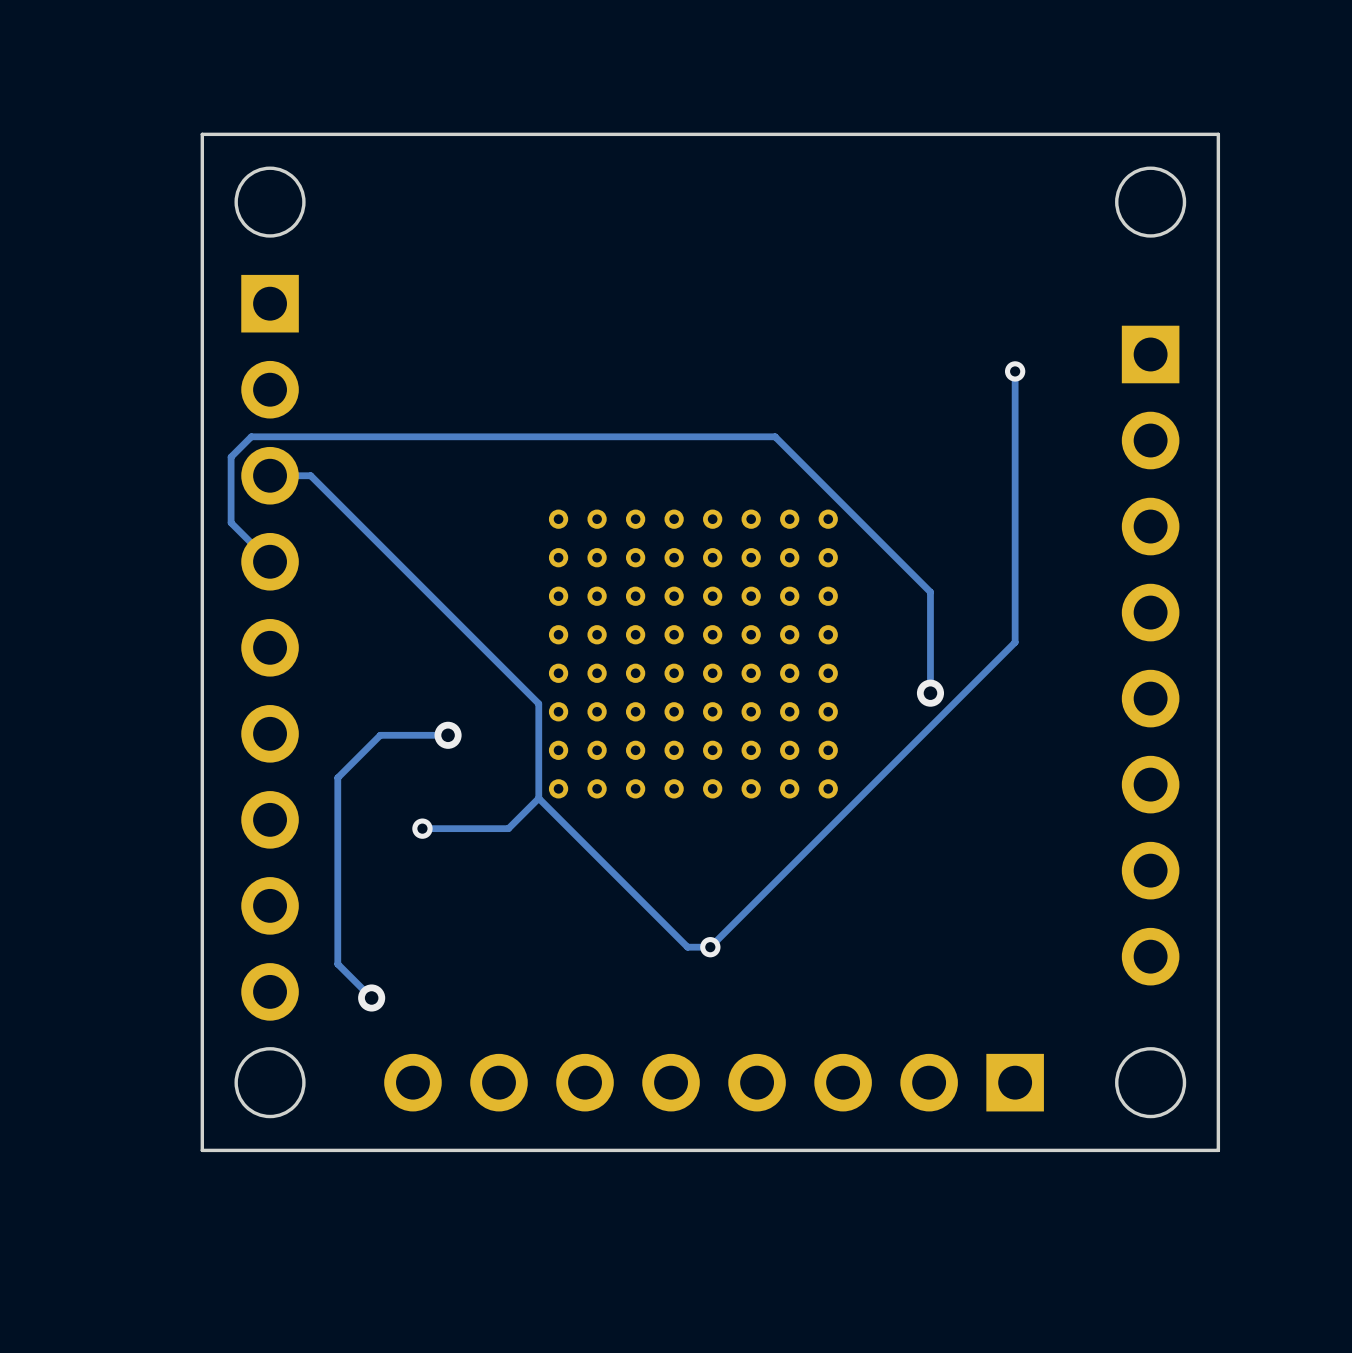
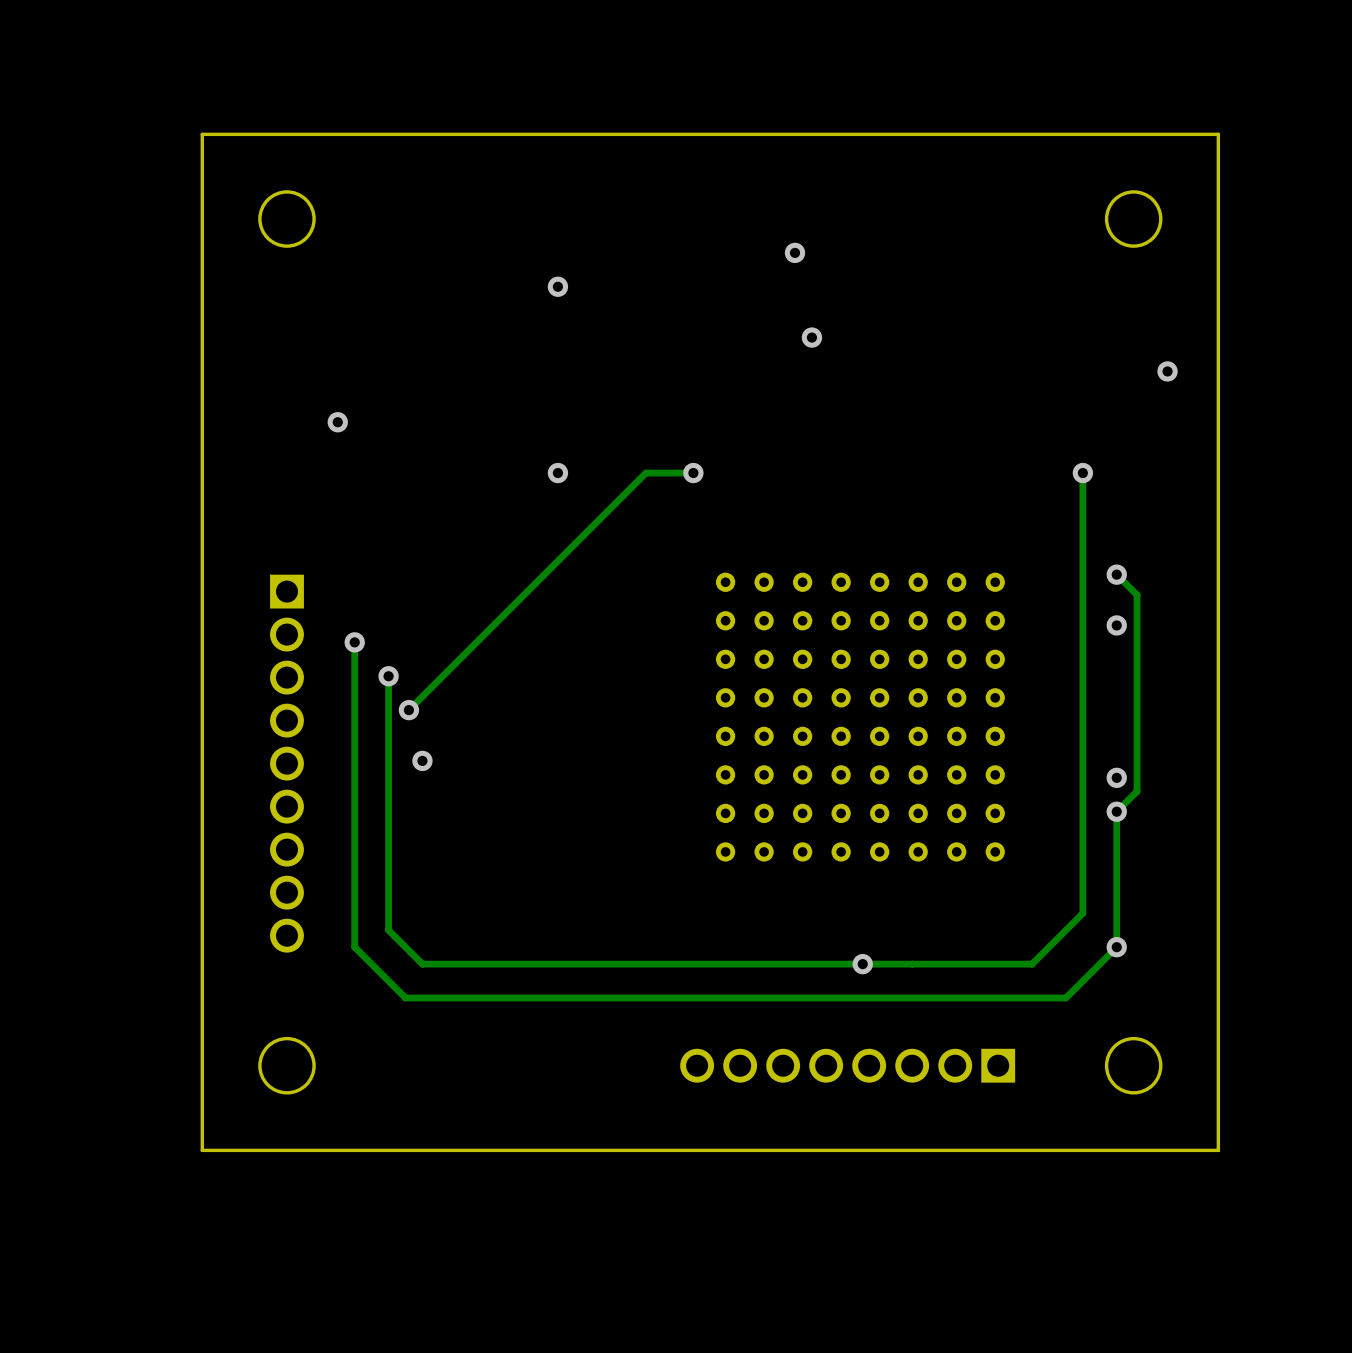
round board edge size: [234, 166, 306, 238] -> [258, 190, 316, 248]
round board edge size: [1115, 166, 1187, 238] -> [1104, 190, 1163, 248]
via: none -> (795, 252)
via: none -> (557, 286)
via: none -> (811, 337)
track: (1015, 371) (1015, 642) (710, 947) (687, 947) (538, 798) -> none
via: (1015, 371) -> none
via: none -> (1167, 371)
via: none -> (337, 422)
via: none -> (557, 473)
track: none -> (693, 473) (645, 473) (408, 710)
via: none -> (693, 473)
track: none -> (1082, 473) (1082, 913) (1032, 964) (422, 964) (388, 930) (388, 676)
via: none -> (1082, 473)
track: (270, 475) (310, 475) (538, 703) (538, 798) -> none
track: (270, 561) (231, 522) (231, 457) (251, 436) (775, 436) (930, 592) (930, 693) -> none
track: none -> (1116, 574) (1137, 594) (1137, 791) (1116, 811) (1116, 947) (1065, 997) (405, 997) (354, 947) (354, 642)
via: none -> (1116, 574)
via: none -> (1116, 625)
via: none -> (354, 642)
part: (270, 647) -> none
part position: (693, 654) -> (860, 717)
part: (1150, 655) -> none
via: none -> (388, 676)
via: (930, 693) -> none
via: none -> (408, 710)
track: (448, 735) (380, 735) (337, 777) (337, 964) (371, 997) -> none
via: (448, 735) -> none
via: none -> (422, 760)
part: none -> (286, 763)
via: none -> (1116, 777)
track: (538, 798) (508, 828) (422, 828) -> none
via: none -> (1116, 811)
via: (422, 828) -> none
via position: (710, 947) -> (862, 964)
via: none -> (1116, 947)
via: (371, 997) -> none
round board edge size: [234, 1047, 306, 1119] -> [258, 1036, 316, 1095]
round board edge size: [1115, 1047, 1187, 1119] -> [1104, 1036, 1163, 1095]
part: none -> (847, 1065)
part: (714, 1082) -> none

